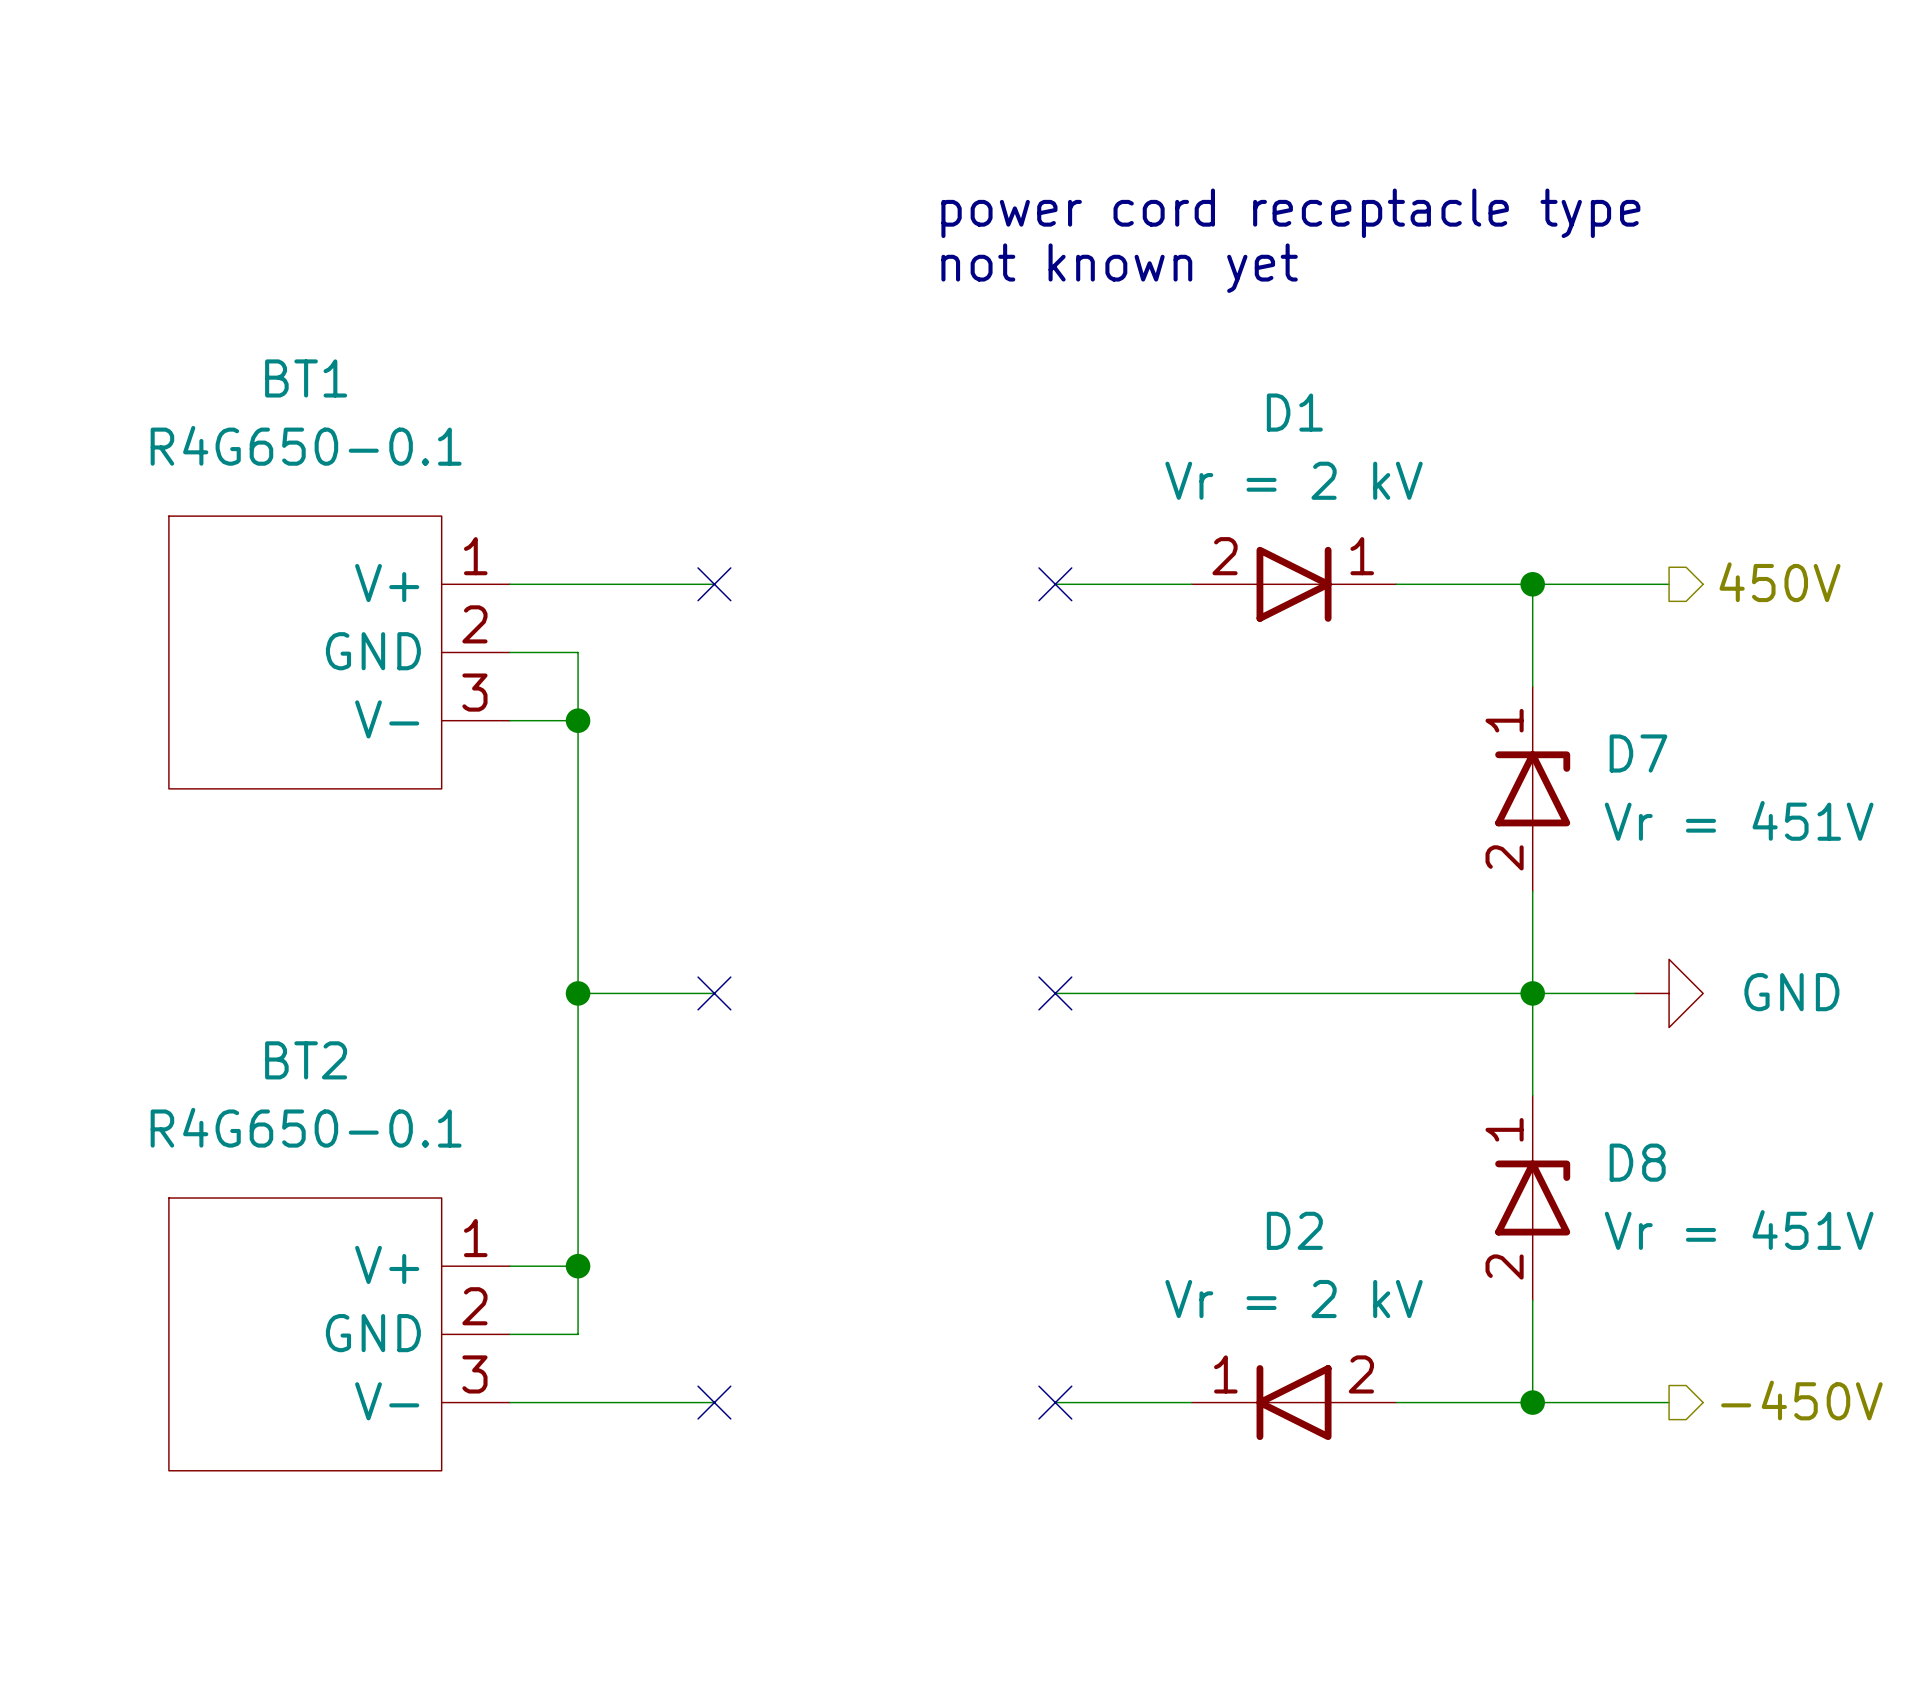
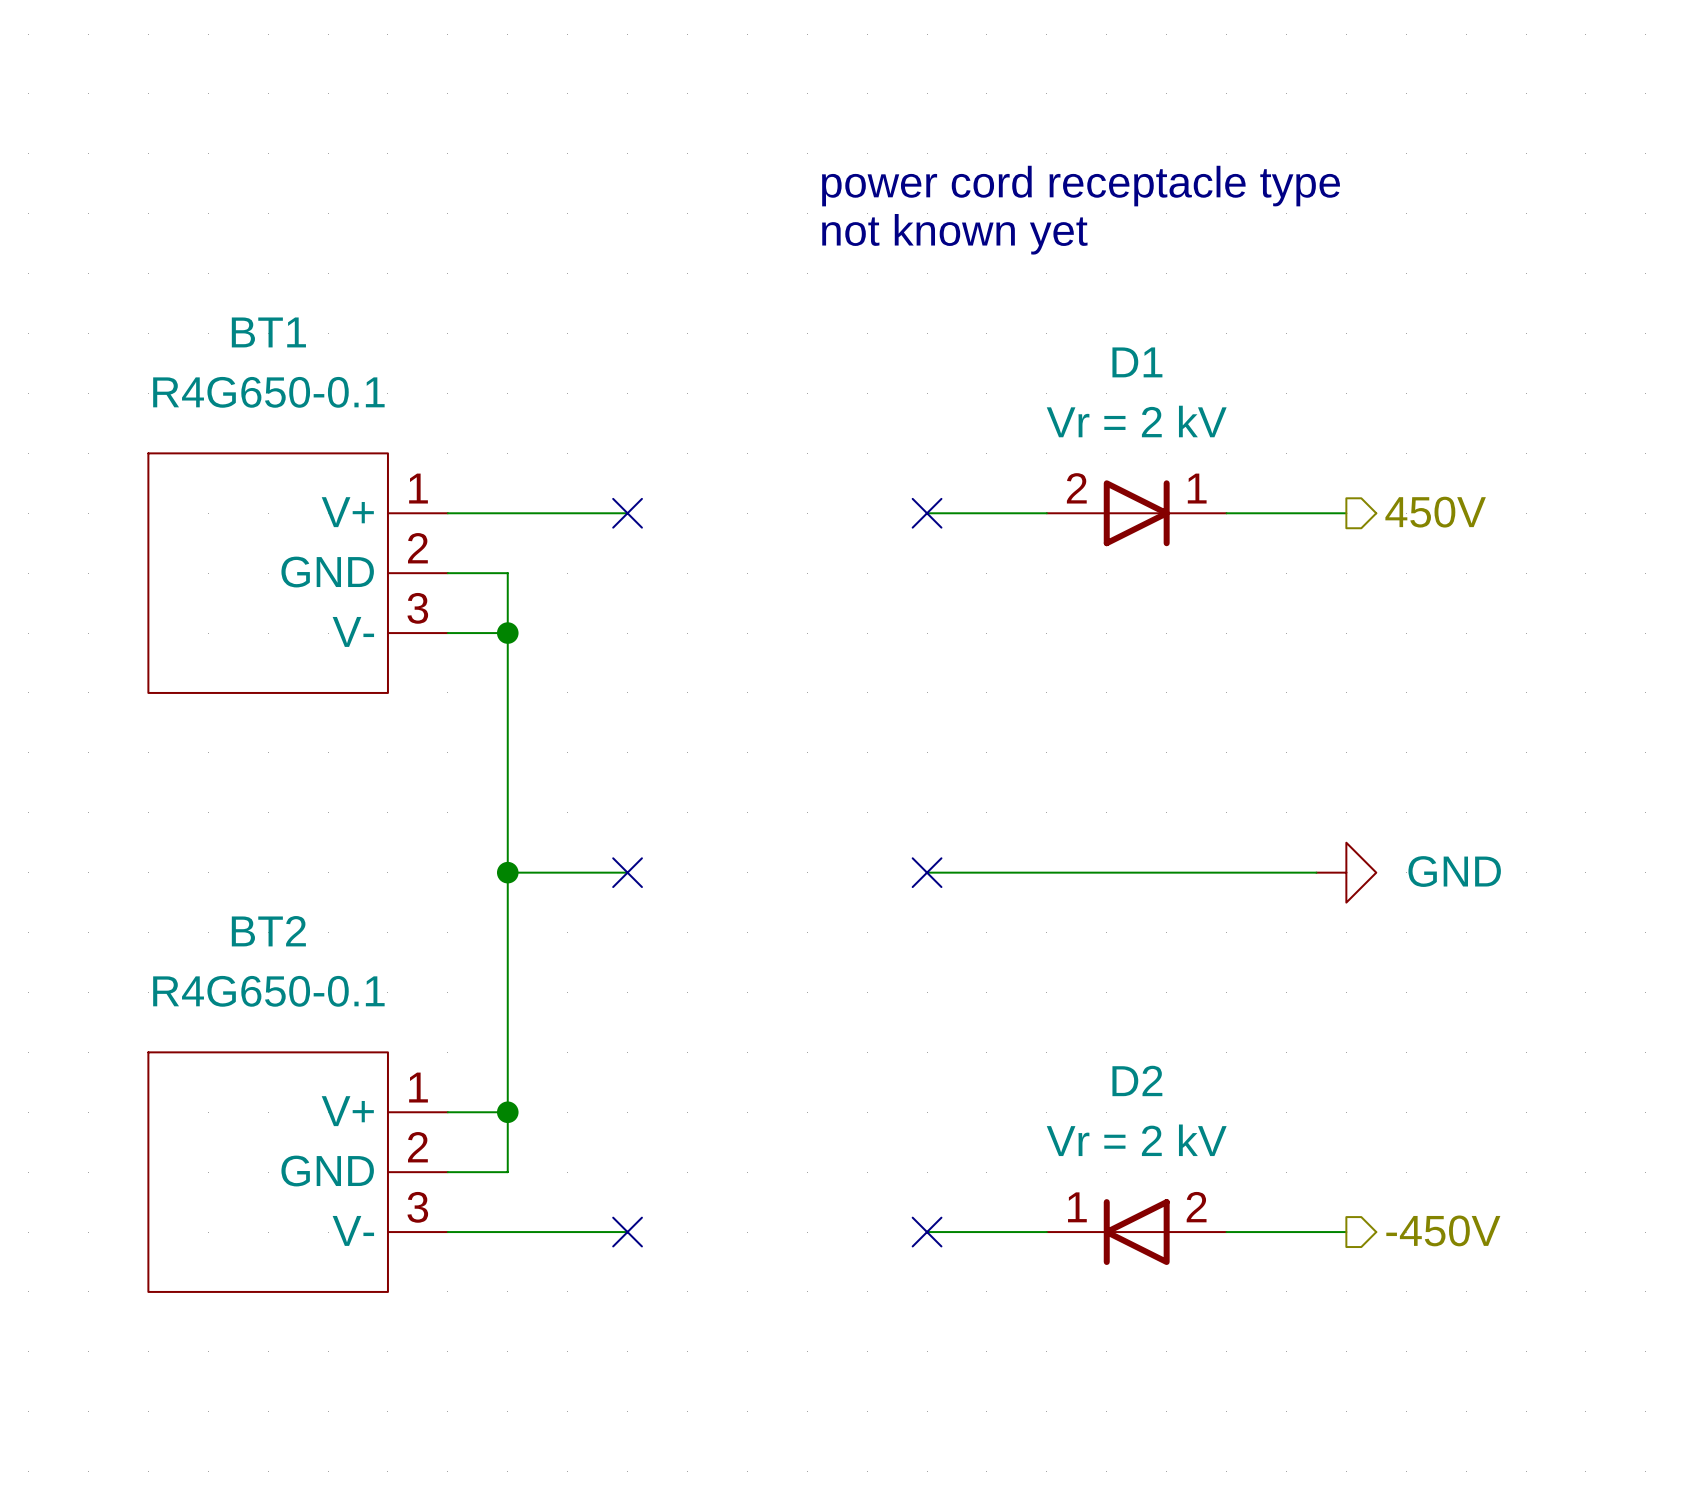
hierarchical label position: 450V (1780, 582) -> 450V (1435, 512)
junction: (1532, 584) -> none
wire: (1669, 584) (1532, 584) (1532, 686) -> none
D7: Vr = 451V (1532, 788) -> none
wire: (1532, 891) (1532, 1095) -> none
wire: (1498, 993) (1634, 993) -> none
junction: (1532, 993) -> none
power symbol position: GND (1669, 993) -> GND (1346, 872)
D8: Vr = 451V (1532, 1198) -> none
wire: (1532, 1300) (1532, 1402) (1669, 1402) -> none
hierarchical label position: -450V (1801, 1400) -> -450V (1443, 1230)
junction: (1532, 1402) -> none

